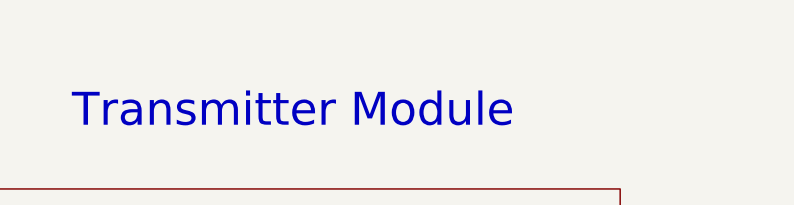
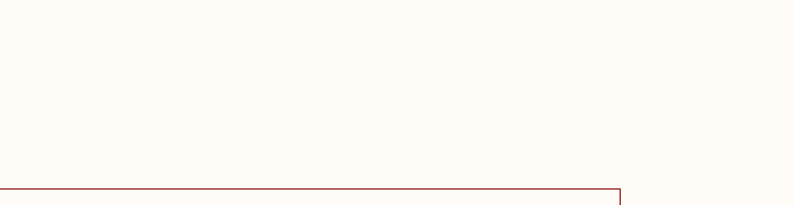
text: Transmitter Module (291, 107) -> none

